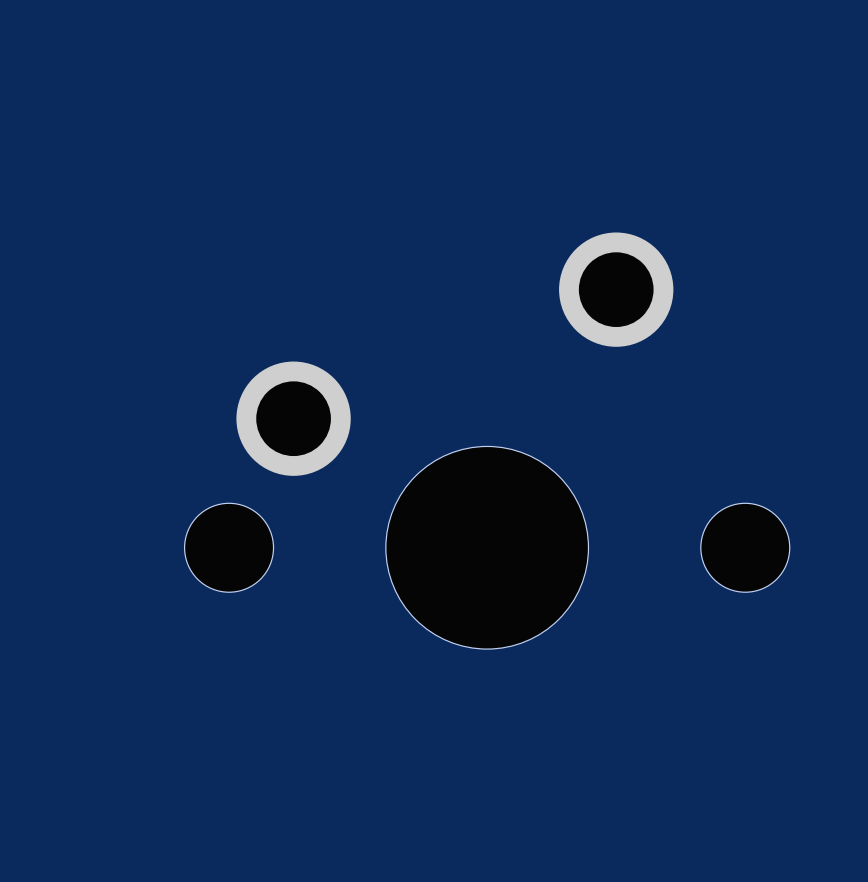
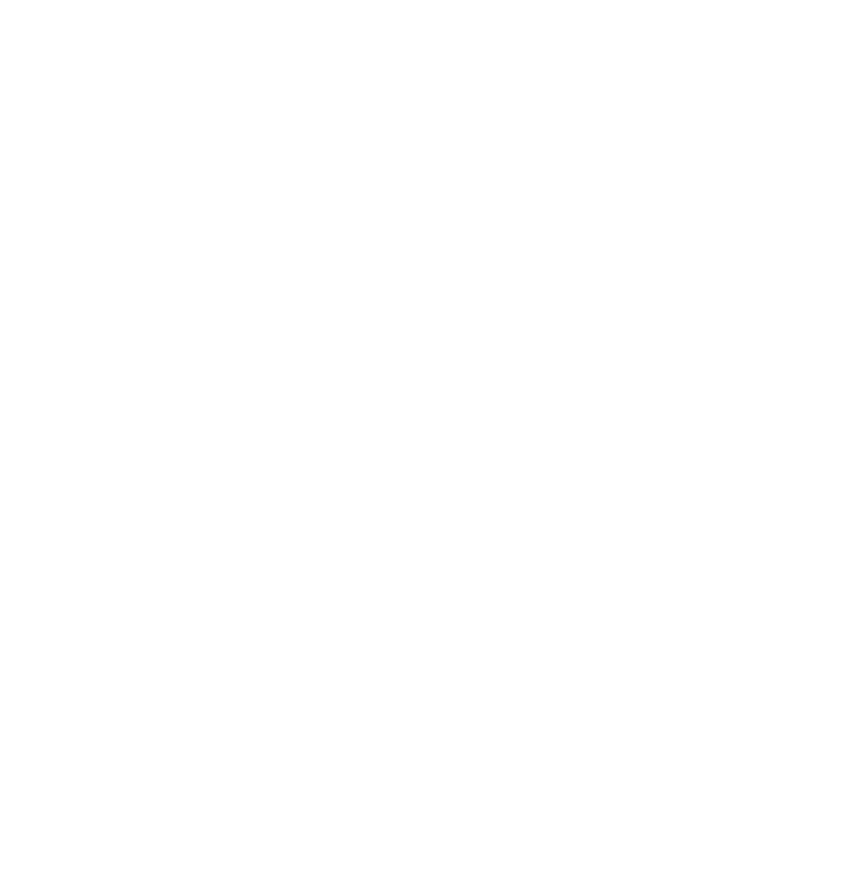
part: (487, 440) -> none

